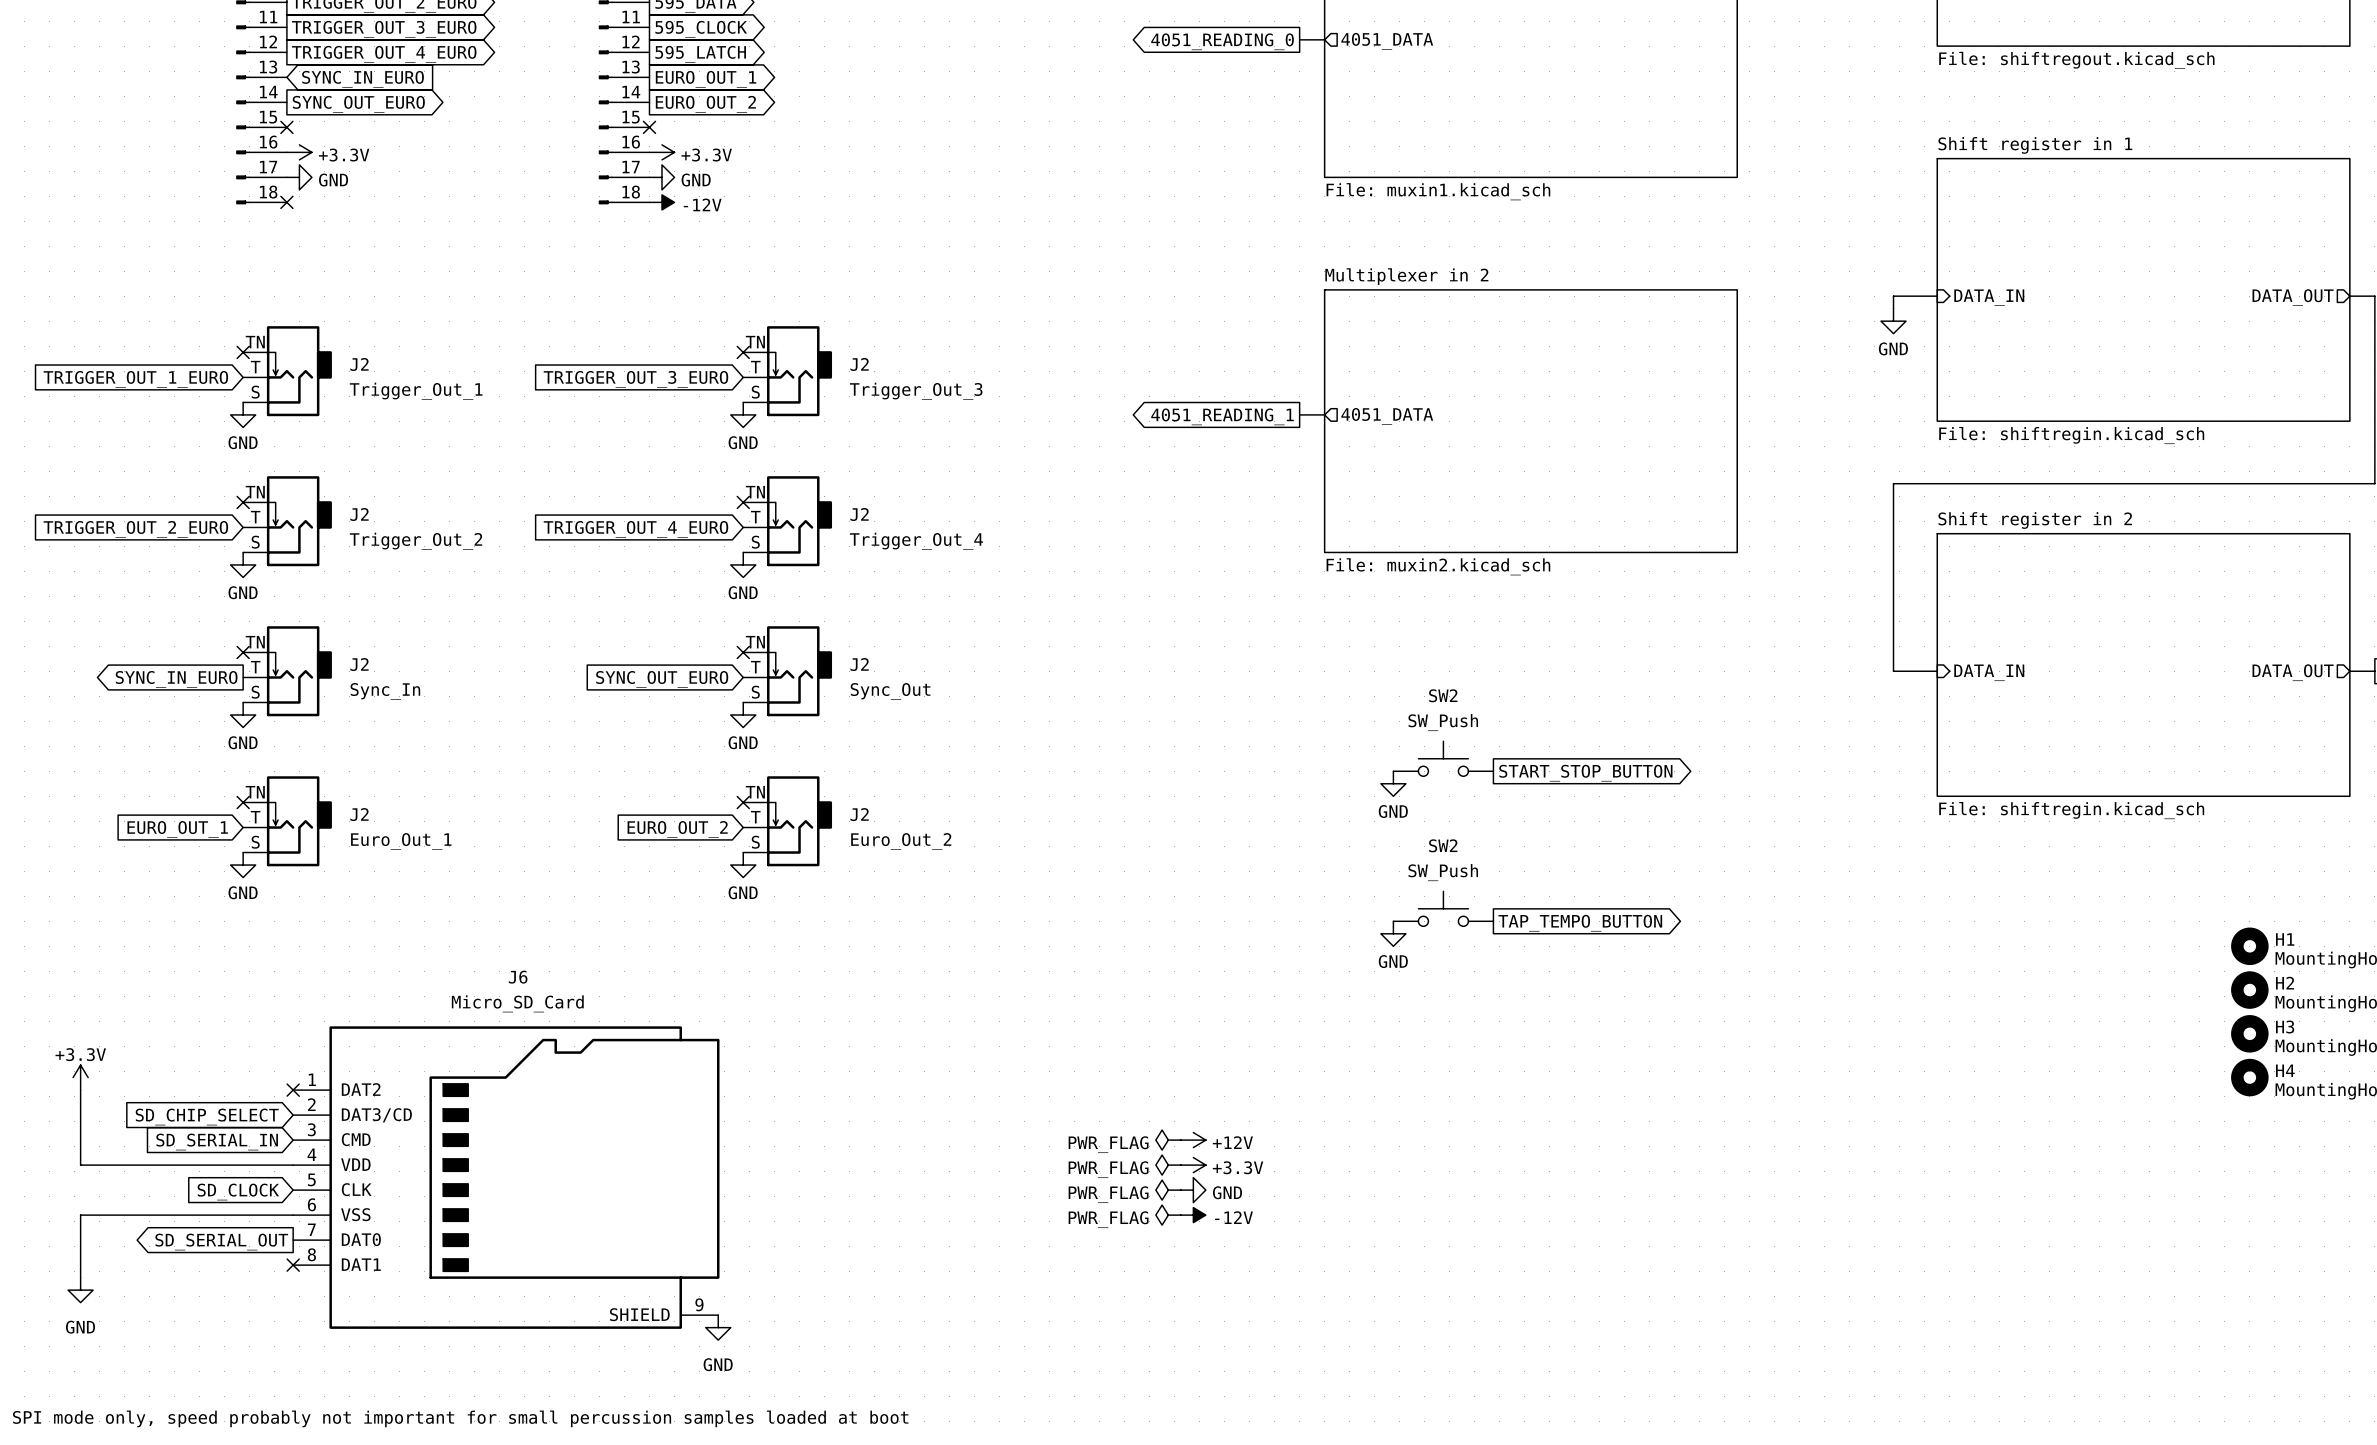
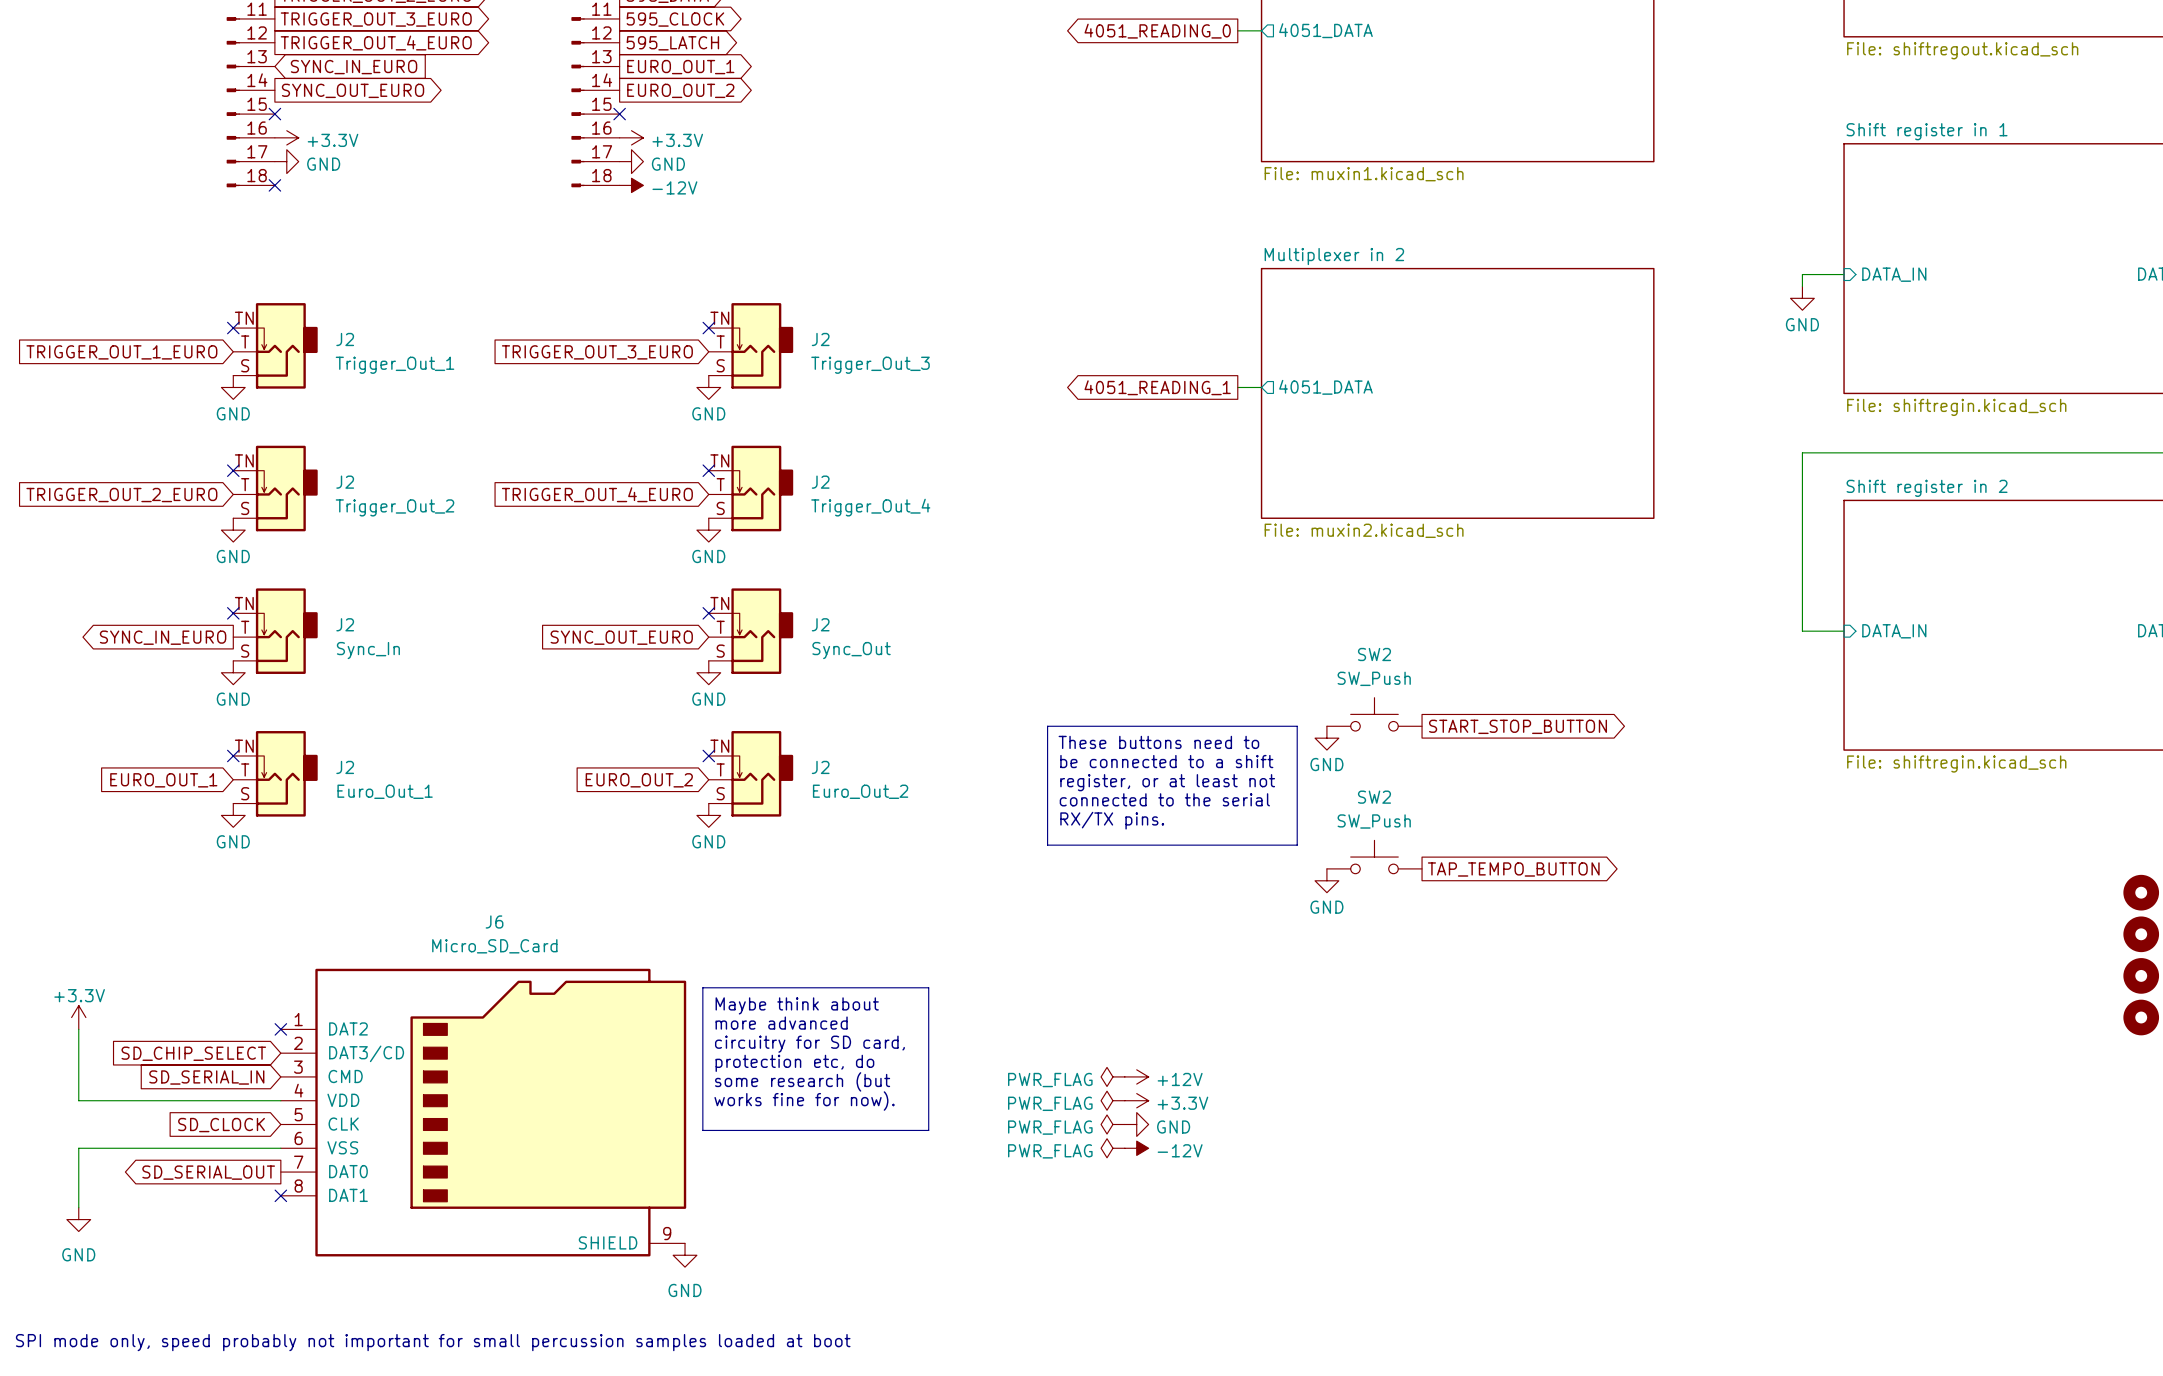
line: none -> (1047, 726) (1297, 726) (1297, 845) (1047, 845) (1047, 726)
text: none -> These buttons need to (1158, 742)
text: none -> be connected to a shift (1166, 761)
text: none -> register, or at least not (1167, 782)
text: none -> connected to the serial (1164, 799)
text: none -> RX/TX pins. (1112, 820)
line: none -> (702, 987) (928, 987) (928, 1130) (702, 1130) (702, 987)
text: none -> Maybe think about (797, 1005)
text: none -> more advanced (781, 1023)
text: none -> circuitry for SD card, (809, 1044)
text: none -> protection etc, do (794, 1063)
text: none -> some research (but (802, 1081)
text: none -> works fine for now). (804, 1101)

